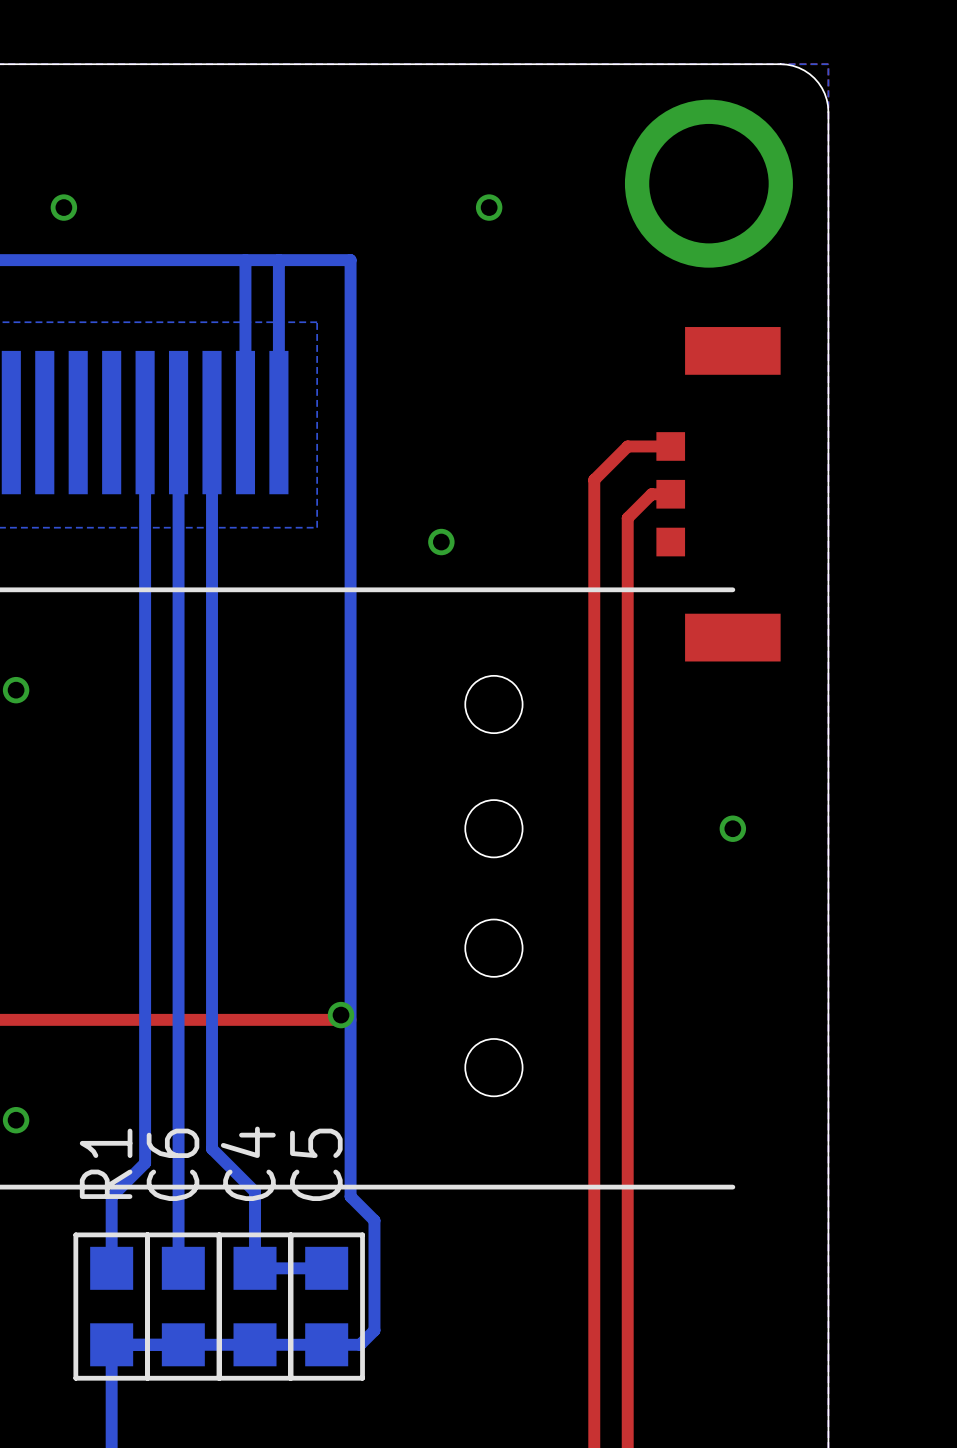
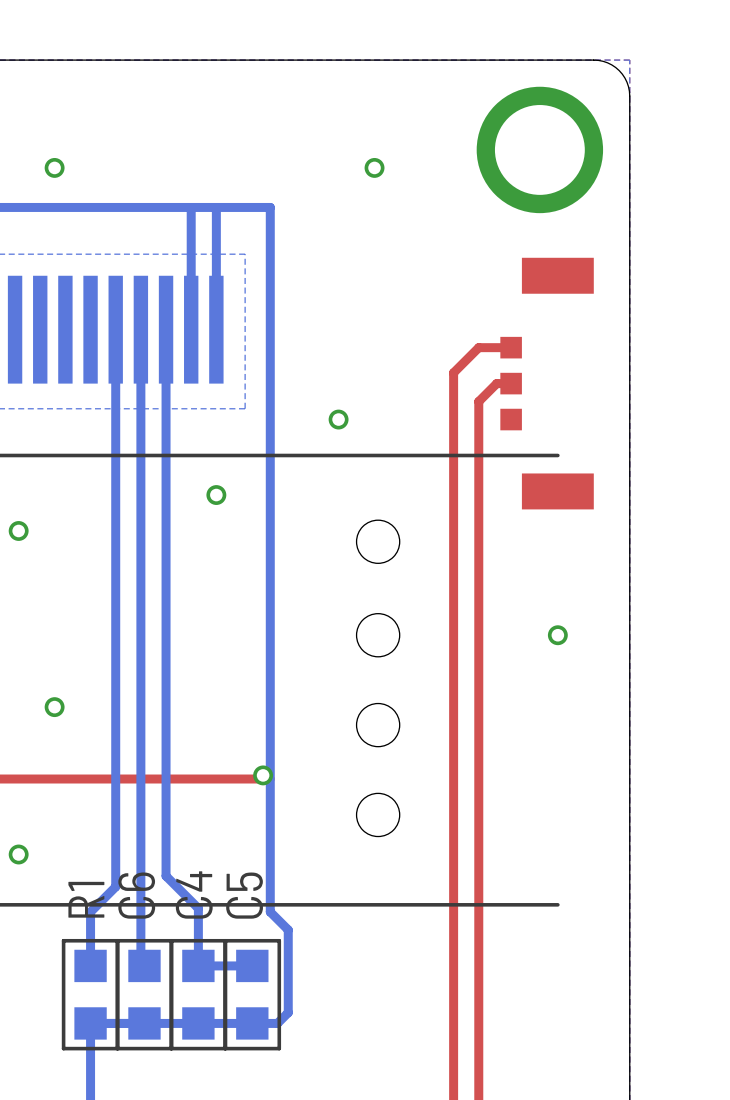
via: none -> (216, 495)
via: none -> (54, 707)

